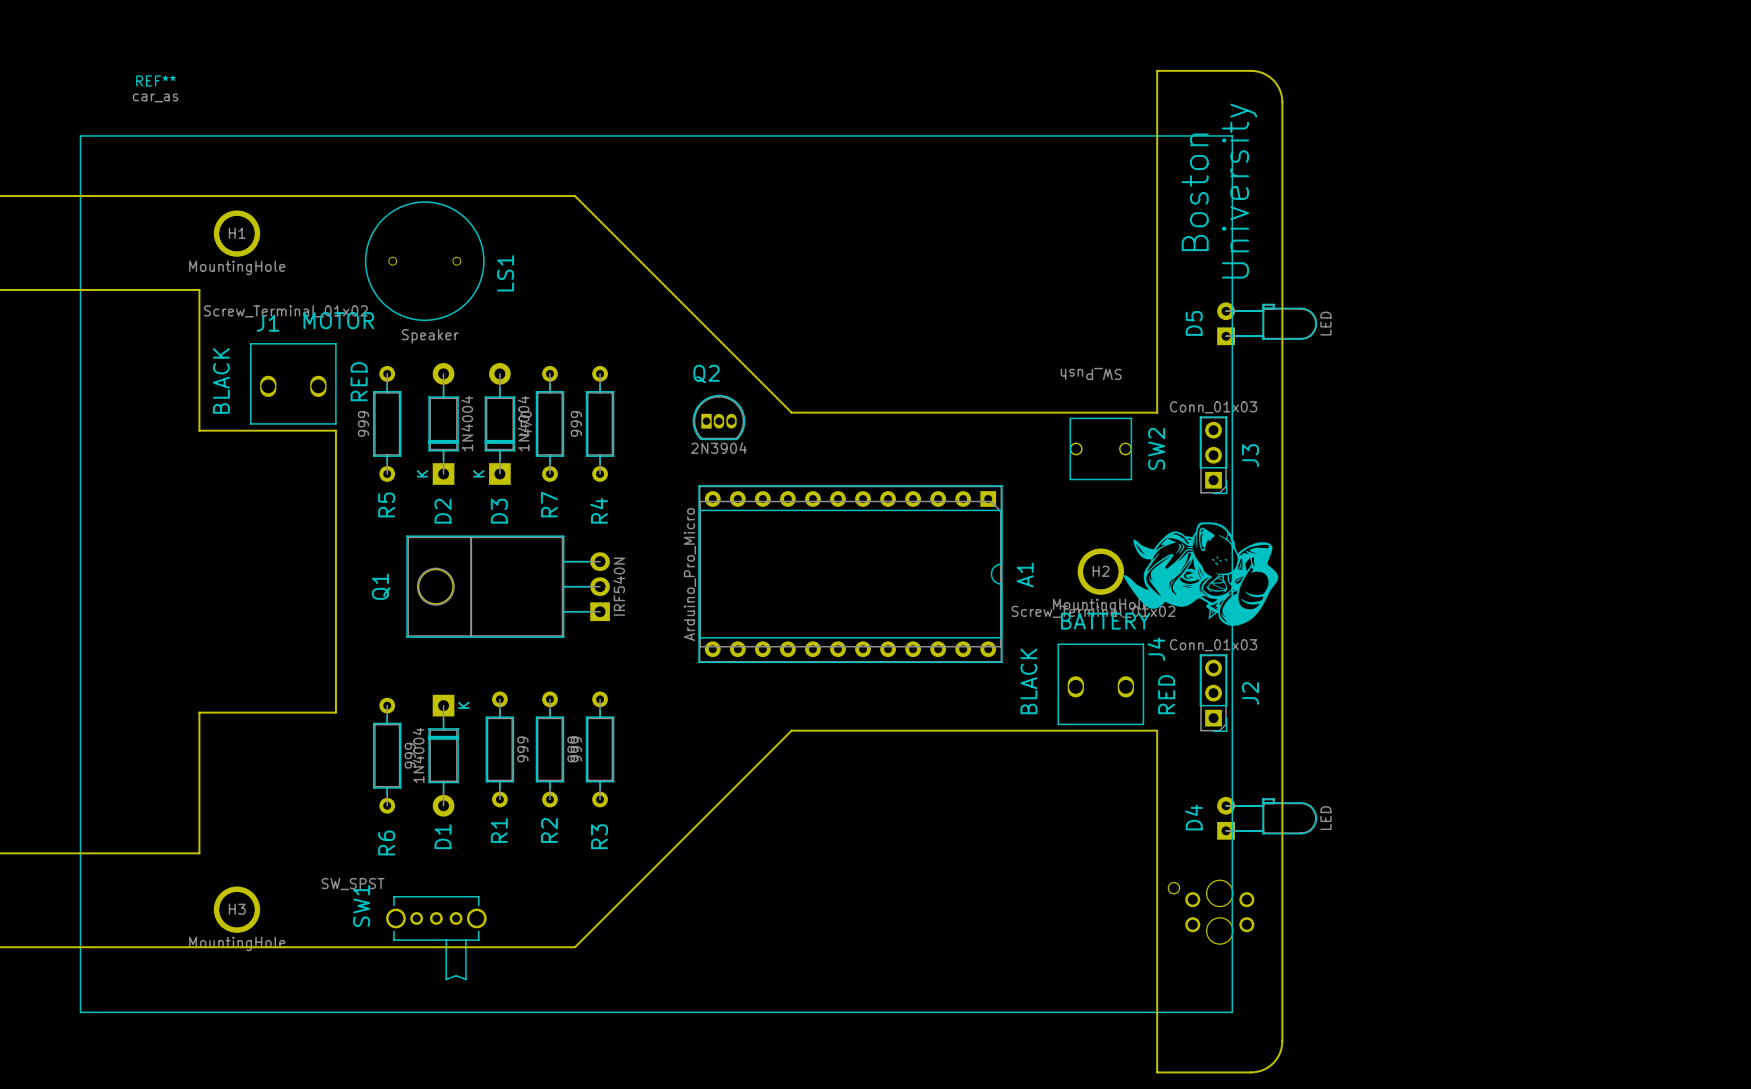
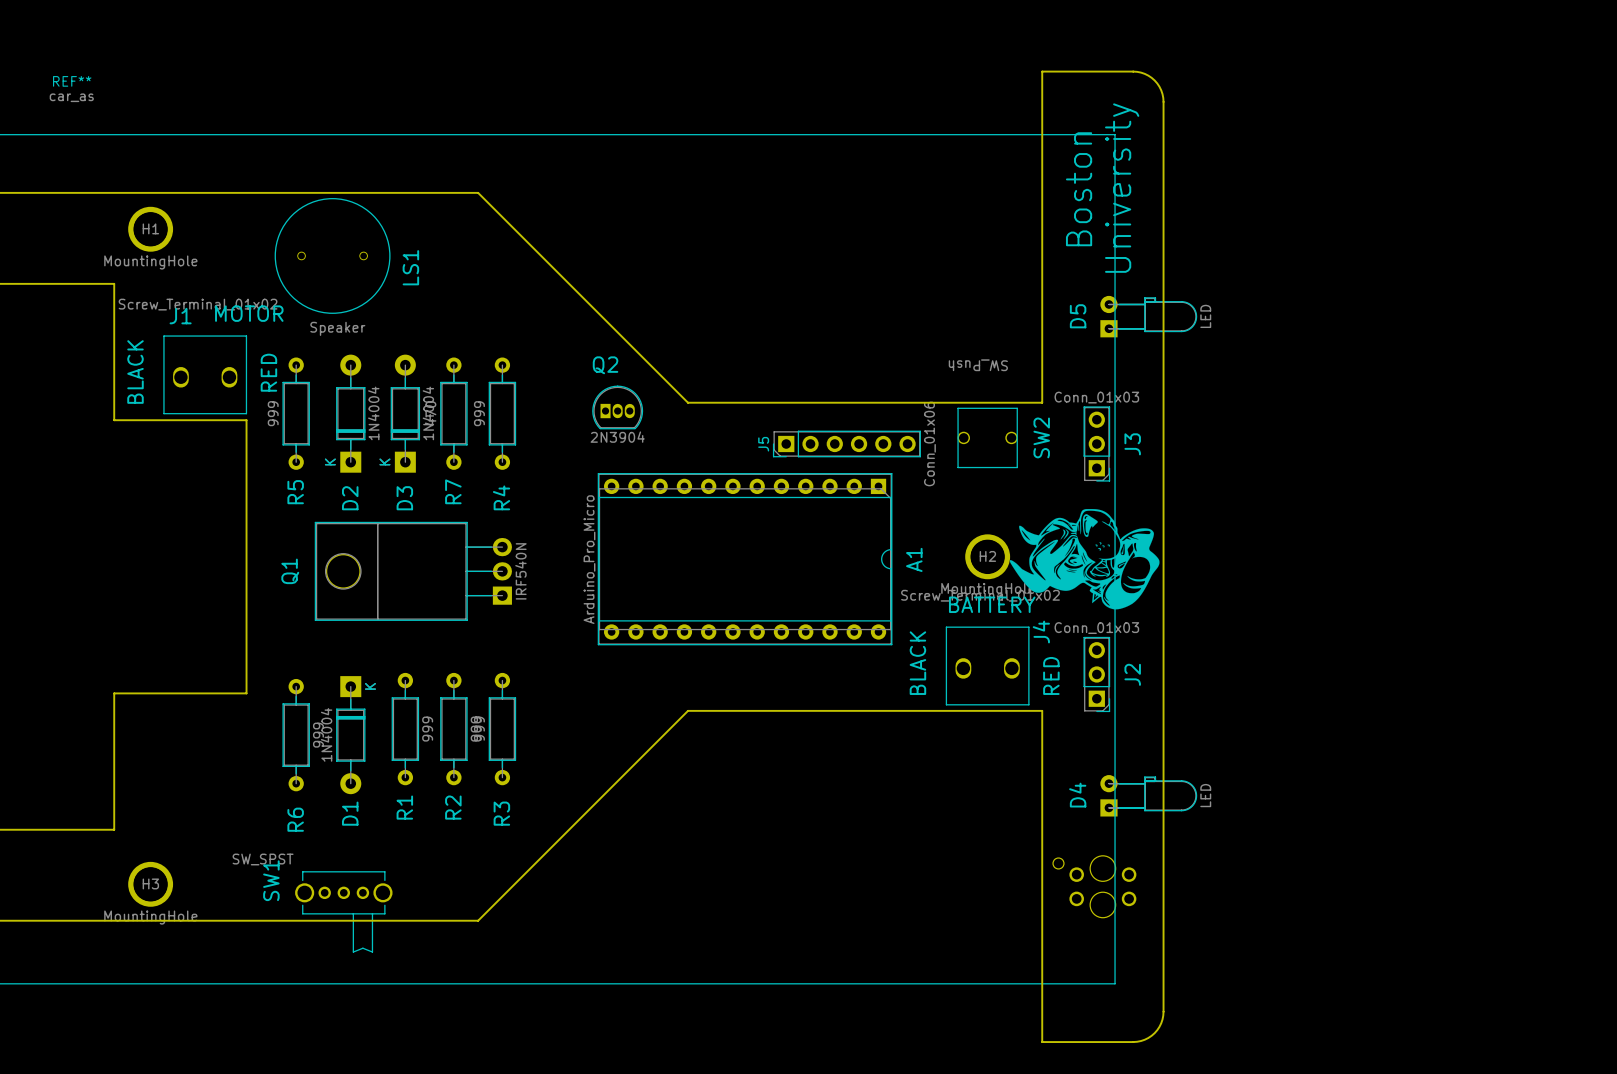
J5: none -> Conn_01x06 (846, 443)

